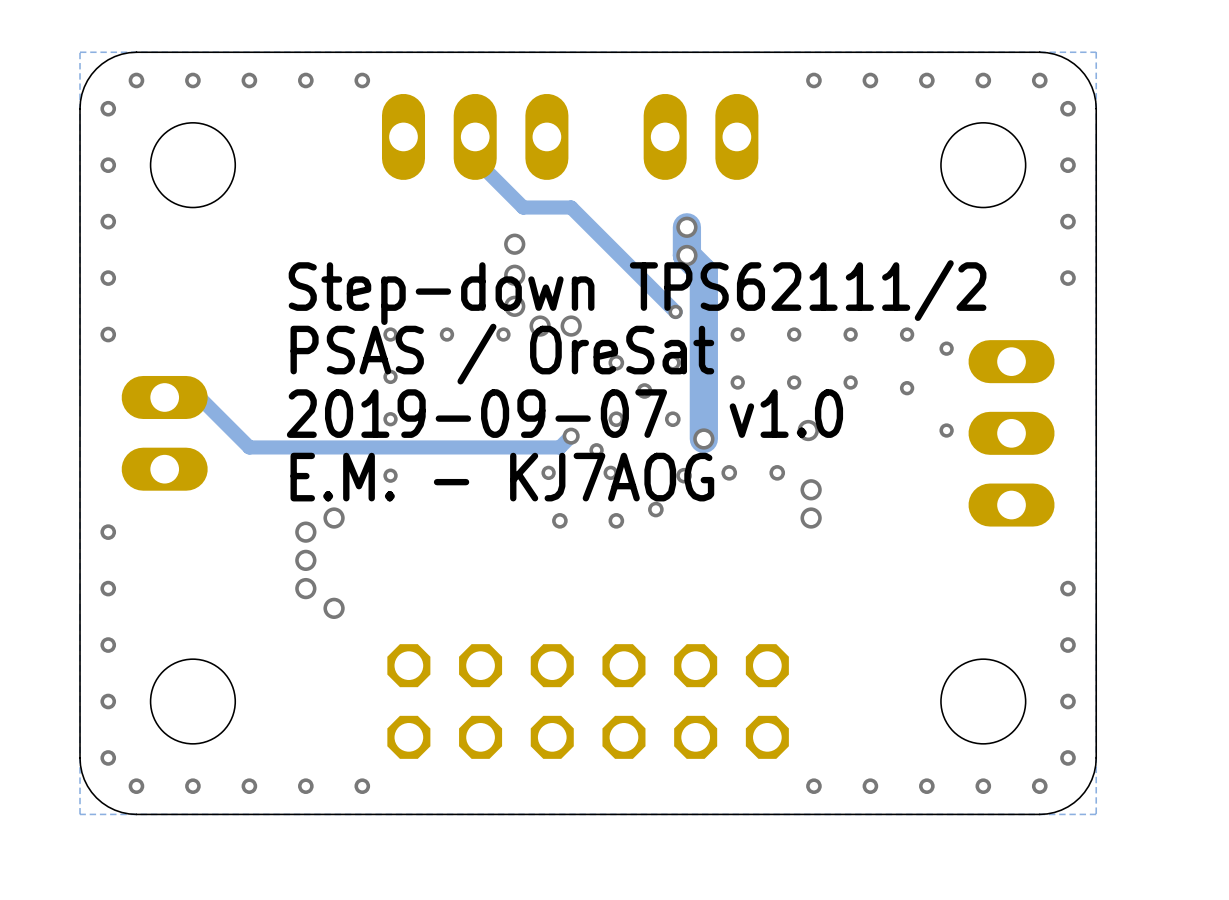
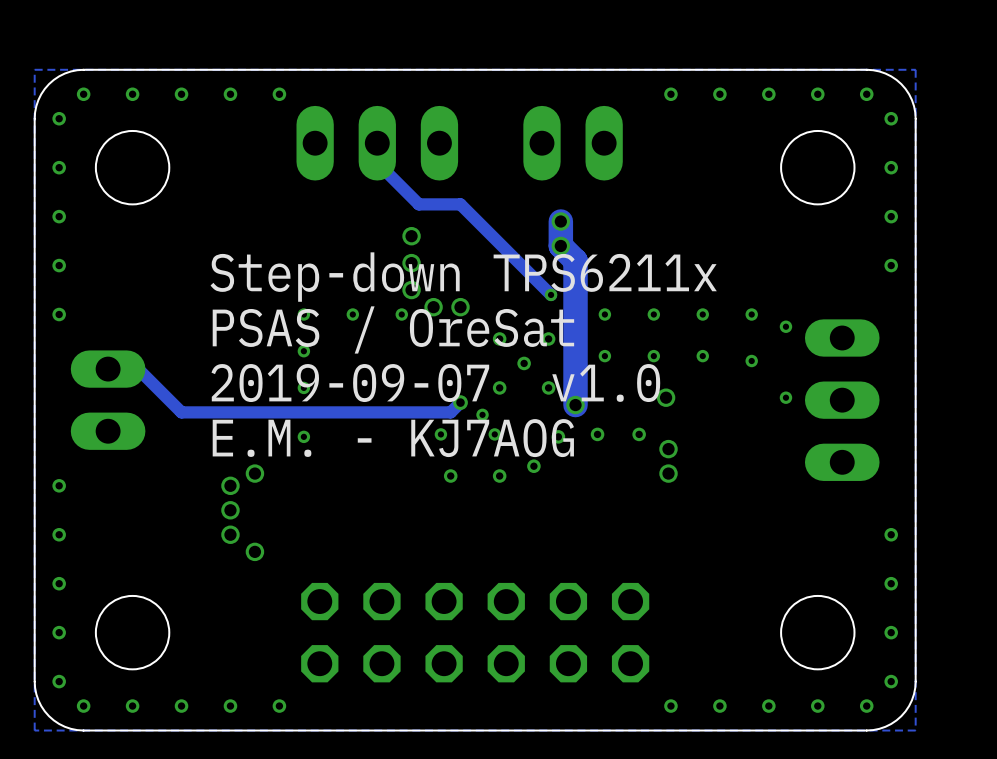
text: Step-down TPS62111/2 (637, 292) -> Step-down TPS6211x (463, 277)

